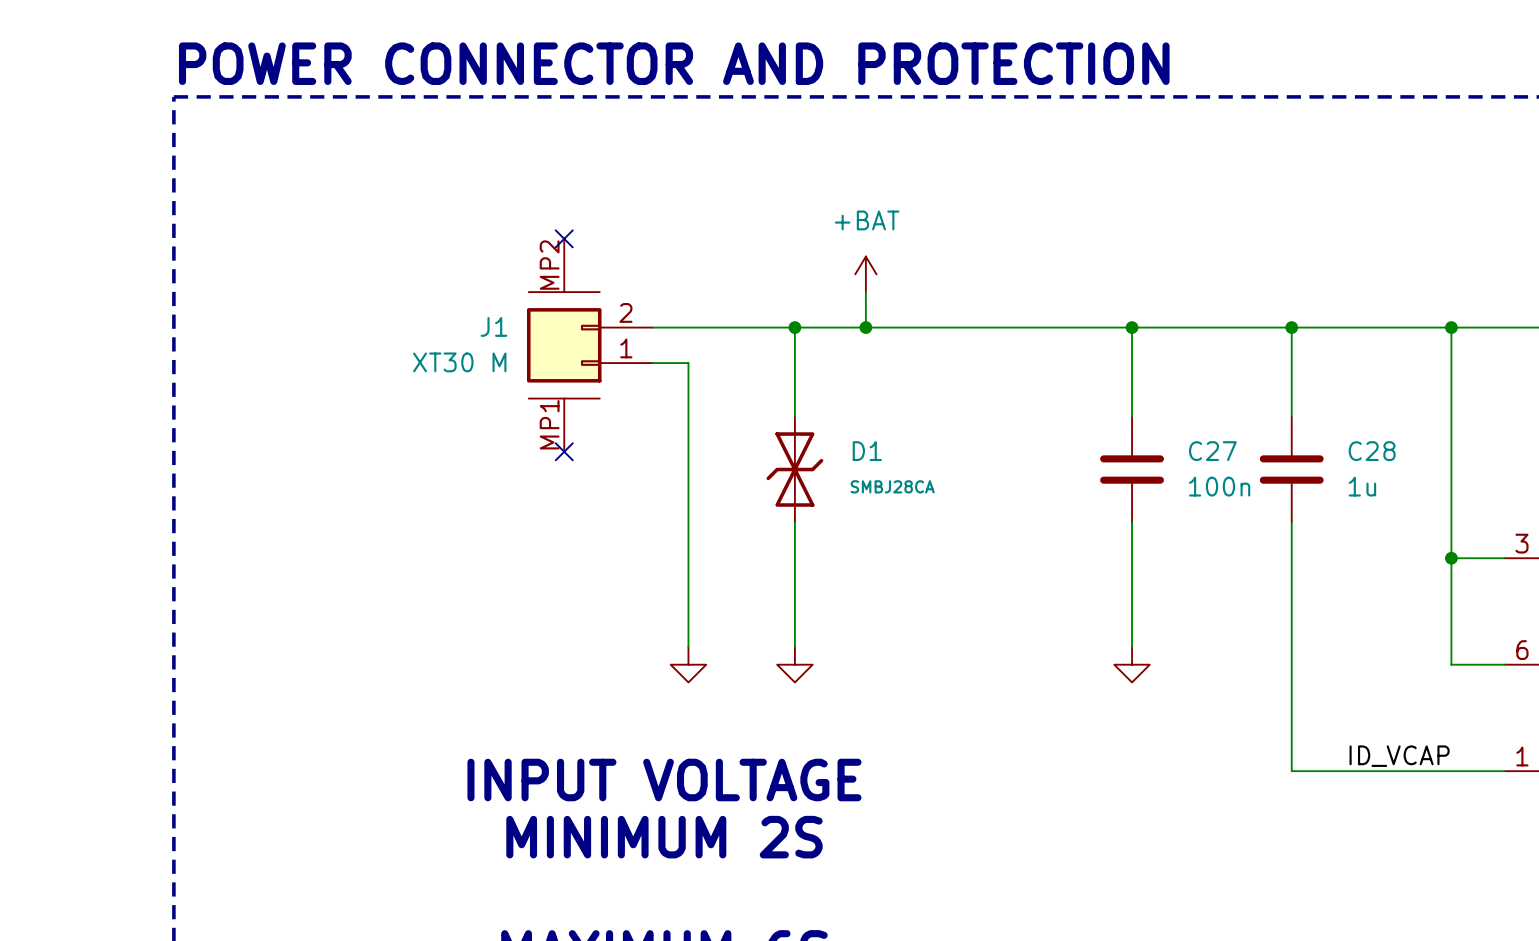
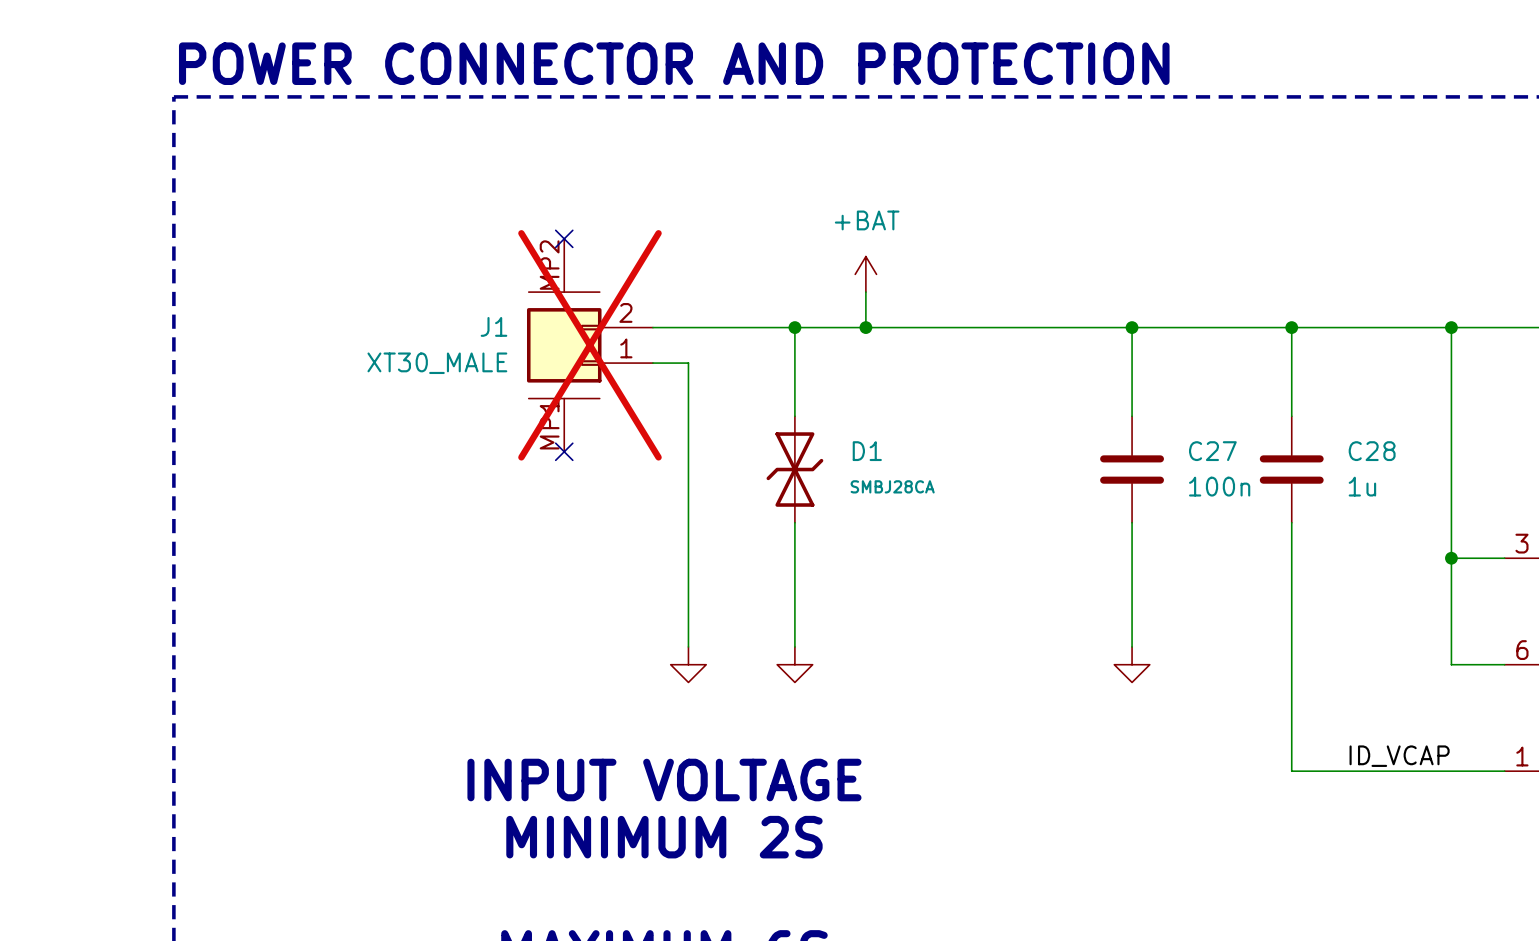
J1 do-not-place cross: none -> (589, 345)
J1 value: XT30 M (459, 362) -> XT30_MALE (437, 363)

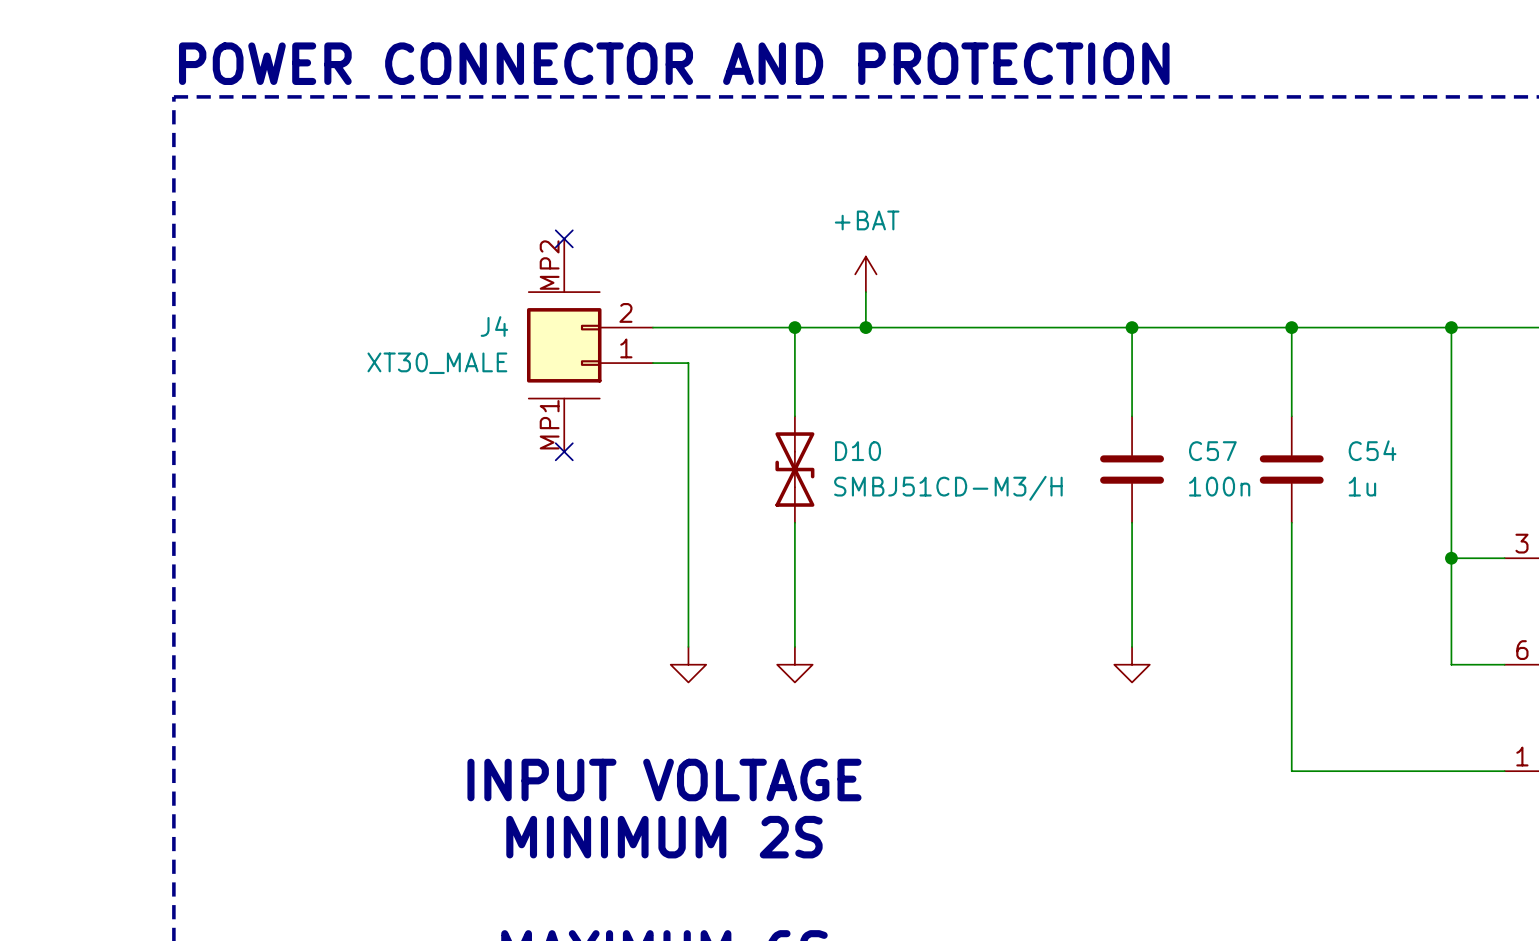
J1 name: J1 (493, 326) -> J4 (494, 326)
J1 do-not-place cross: (589, 345) -> none
C27 name: C27 (1212, 451) -> C57 (1212, 451)
C28 name: C28 (1372, 451) -> C54 (1372, 450)
D1: SMBJ28CA (794, 469) -> none
D10: none -> SMBJ51CD-M3/H (794, 469)
label: ID_VCAP (1399, 756) -> none

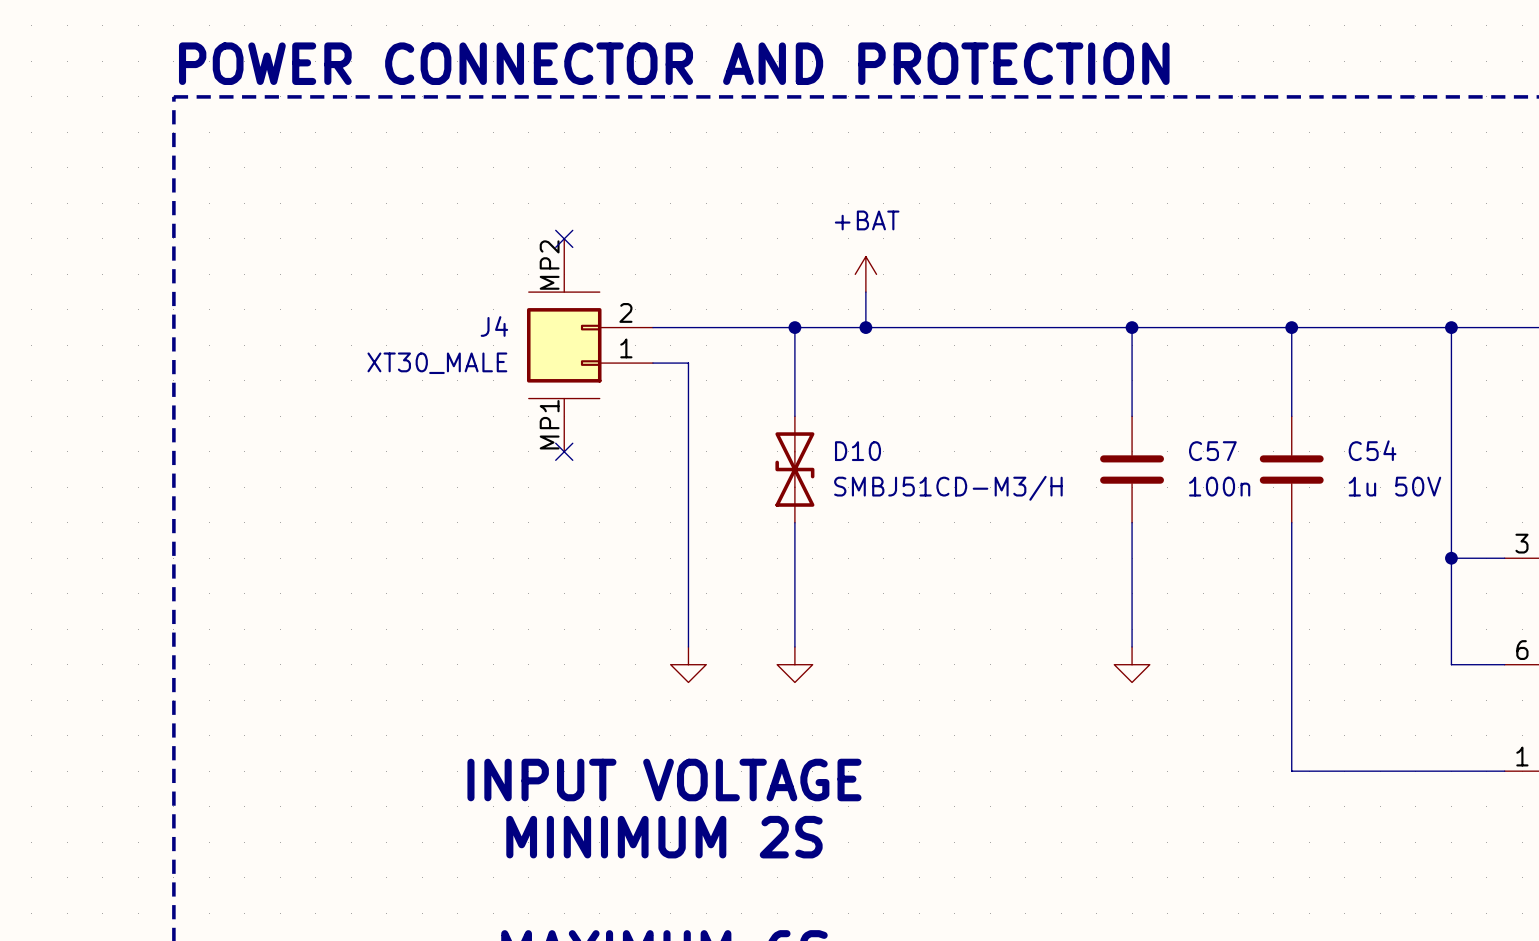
C54 value: 1u (1362, 486) -> 1u 50V (1394, 486)

